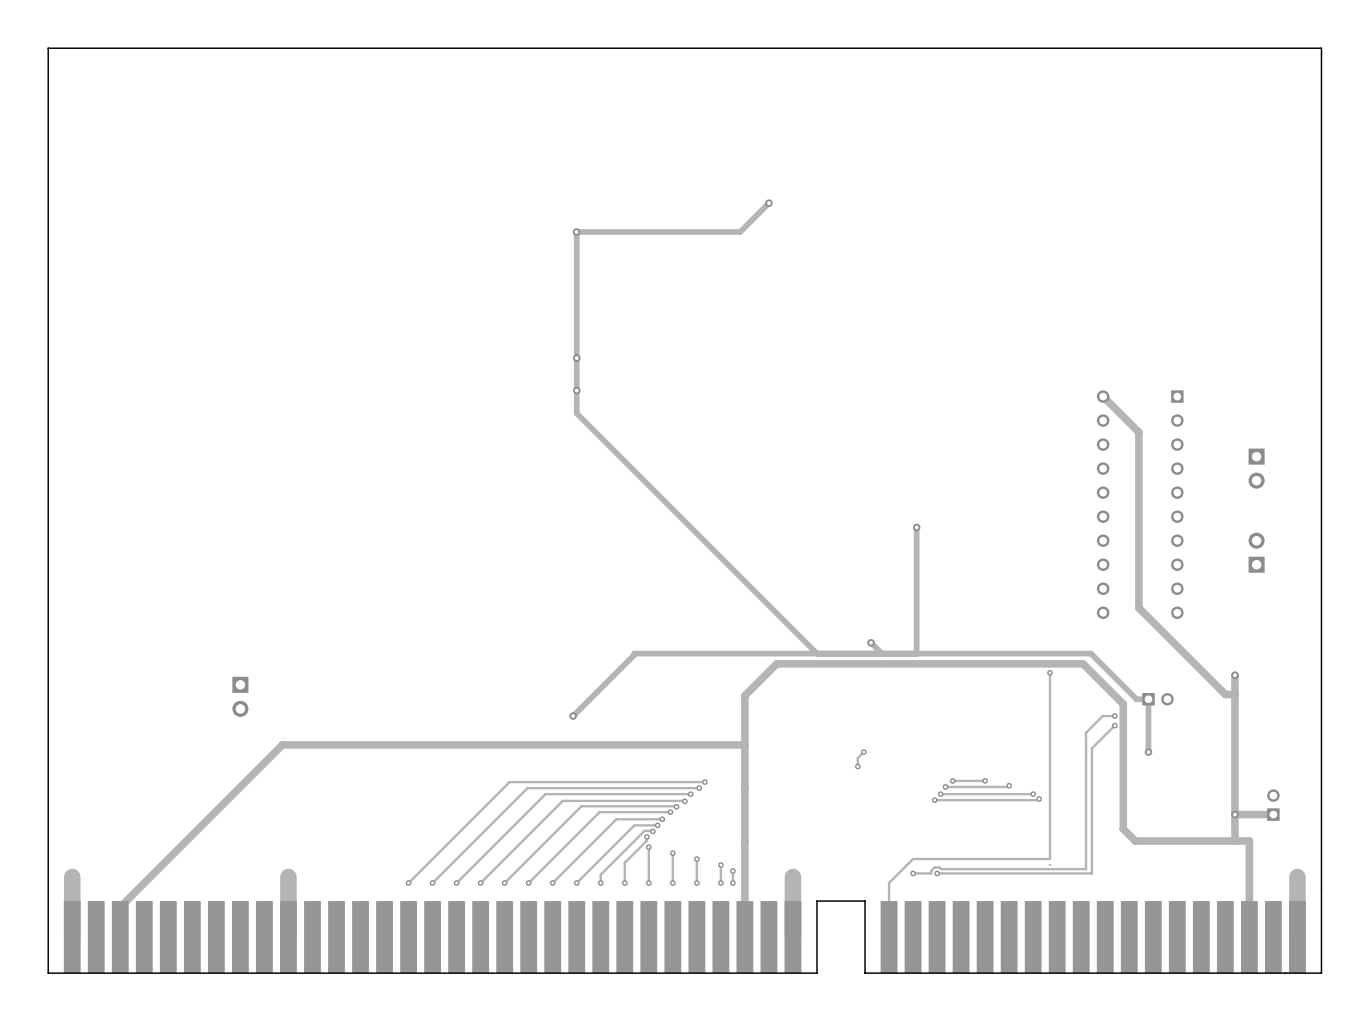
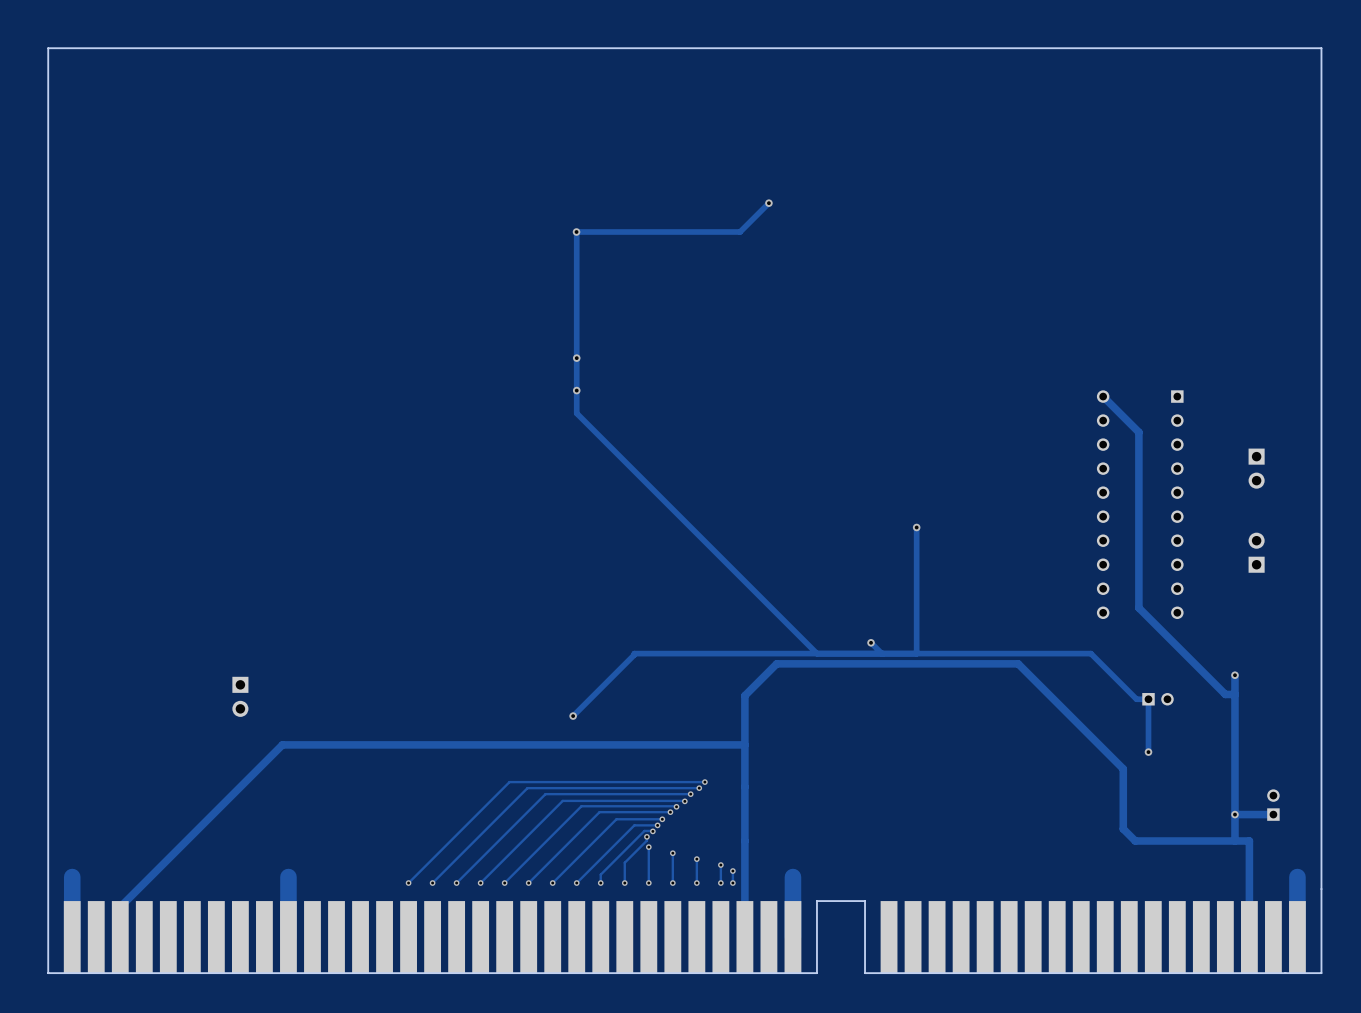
track: (1018, 663) (1083, 663) (1123, 704) (1123, 768) -> (1018, 663) (1123, 768)
track: (1049, 672) (1049, 859) (913, 859) (889, 883) (889, 937) -> none
via: (1049, 672) -> none
track: (1114, 716) (1102, 716) (1086, 732) (1086, 869) (941, 869) (934, 867) (931, 873) (913, 873) -> none
via: (1114, 716) -> none
track: (1114, 725) (1091, 748) (1091, 873) (937, 873) -> none
via: (1114, 725) -> none
track: (863, 752) (857, 758) (857, 766) -> none
via: (863, 752) -> none
via: (857, 766) -> none
via: (952, 780) -> none
track: (985, 780) (952, 780) -> none
via: (985, 780) -> none
track: (1009, 785) (945, 786) -> none
via: (1009, 785) -> none
via: (945, 786) -> none
via: (940, 794) -> none
track: (1033, 794) (940, 794) -> none
via: (1033, 794) -> none
track: (1039, 798) (934, 800) -> none
via: (1039, 798) -> none
via: (934, 800) -> none
via: (913, 873) -> none
via: (937, 873) -> none

